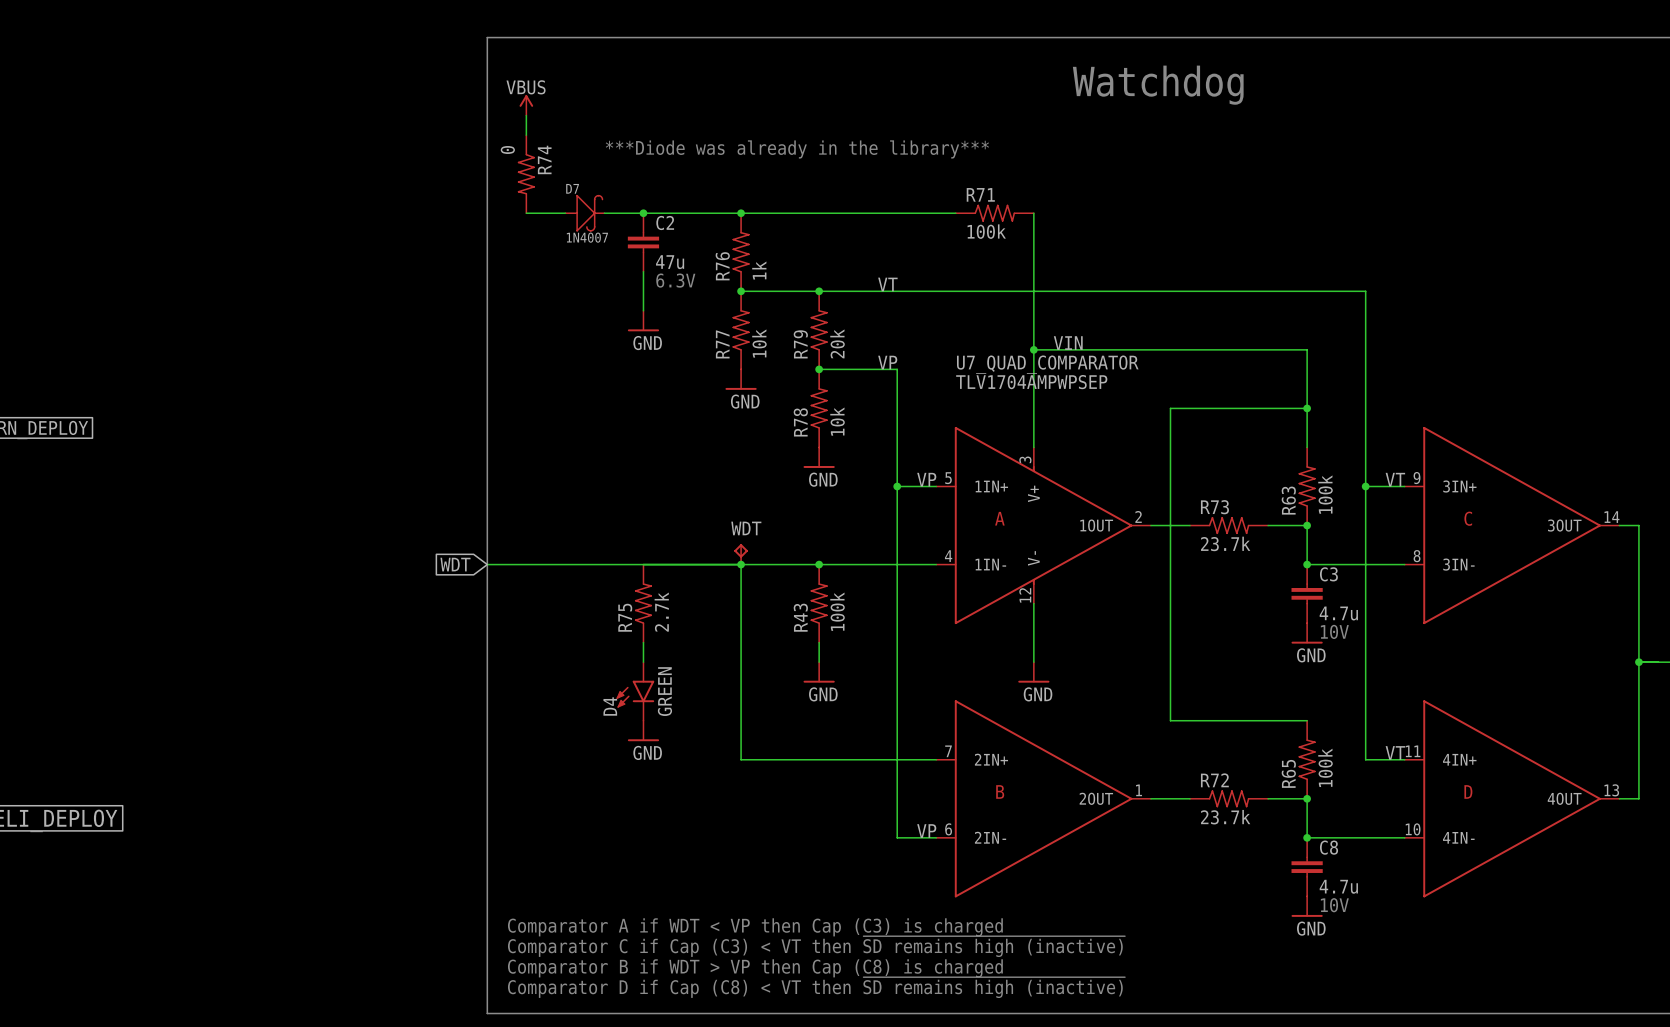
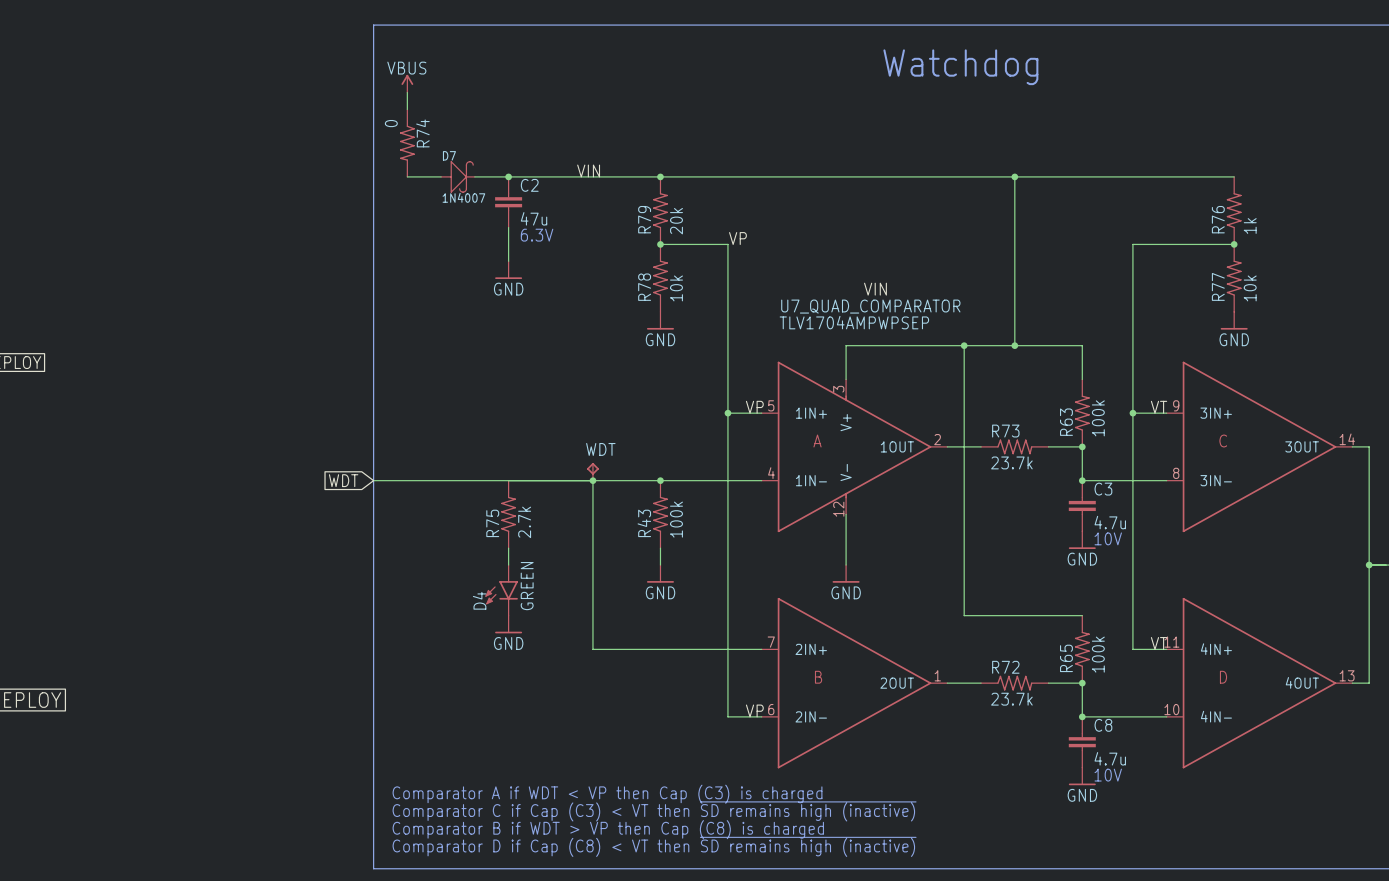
text: ***Diode was already in the library*** (797, 149) -> none
label: none -> VIN (588, 171)
junction: (741, 213) -> none
junction: none -> (660, 176)
wire: none -> (778, 176) (1234, 176)
R71: 100k (994, 213) -> none
wire: (1033, 213) (1033, 408) -> (964, 345) (846, 345)
wire: none -> (1014, 176) (1014, 345)
junction: none -> (1014, 176)
R76 position: (741, 252) -> (1234, 210)
R79: none -> 20k (660, 210)
label: VT (887, 284) -> none
wire: (741, 291) (819, 291) -> none
junction: (741, 291) -> none
wire: (897, 291) (1365, 291) -> (1234, 244) (1132, 244)
junction: none -> (1234, 244)
R77 position: (741, 330) -> (1234, 278)
R79 value: 20k (837, 343) -> 10k (676, 288)
R79 name: R79 (800, 344) -> R78 (644, 287)
wire: (1033, 349) (1307, 349) (1307, 408) -> none
junction: (1033, 349) -> none
label position: VP (887, 362) -> VP (737, 238)
wire: (819, 369) (897, 369) -> (727, 244) (727, 311)
junction: (819, 369) -> none
power symbol: GND (741, 379) -> none
power symbol: none -> GND (660, 320)
power symbol: none -> GND (1234, 320)
R78: 10k (819, 408) -> none
junction: none -> (964, 345)
junction: none -> (1014, 345)
junction: (1307, 408) -> none
power symbol: GND (819, 457) -> none

